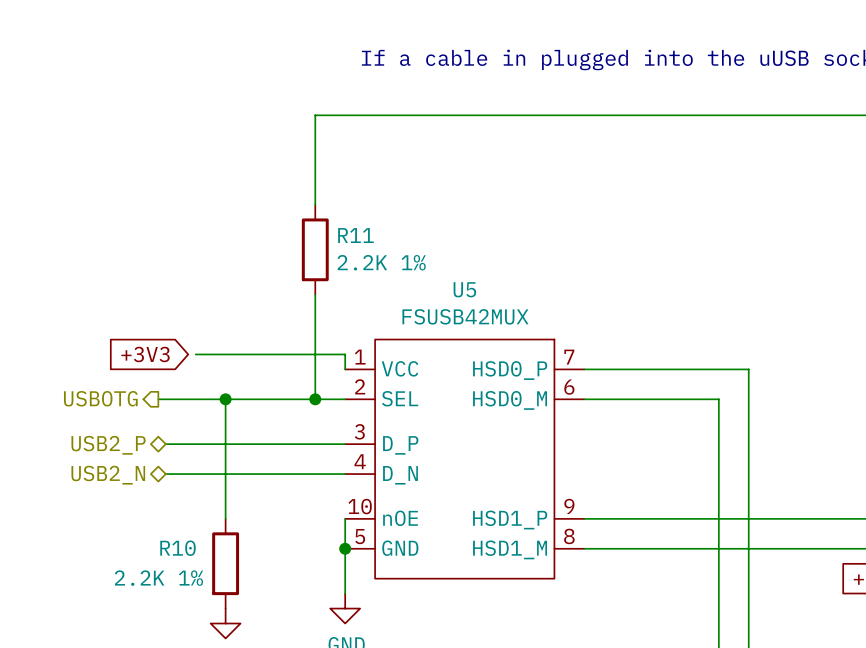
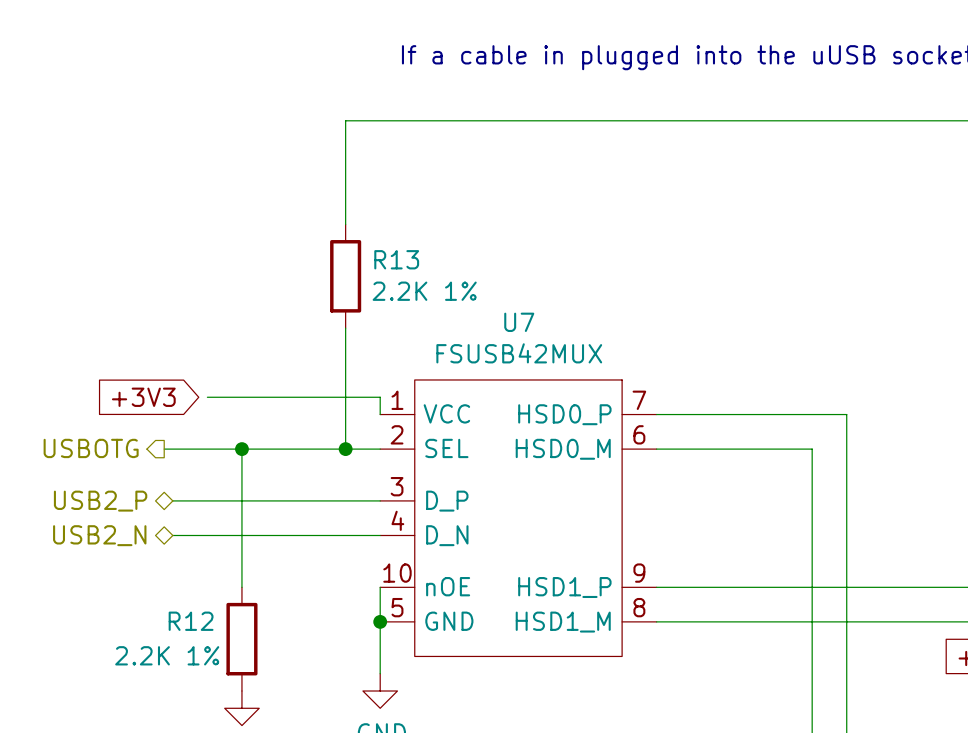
R11 name: R11 (355, 235) -> R13 (396, 259)
U5 name: U5 (464, 289) -> U7 (519, 322)
R10 name: R10 (177, 548) -> R12 (191, 621)

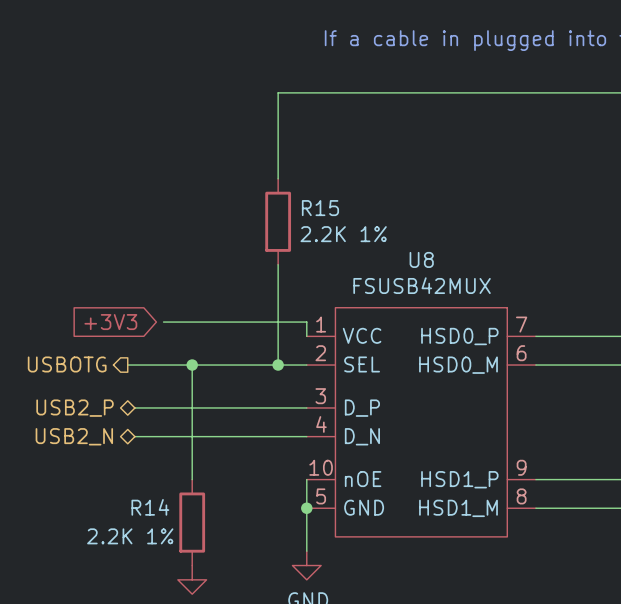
R13 name: R13 (396, 259) -> R15 (320, 208)
U7 name: U7 (519, 322) -> U8 (421, 259)
R12 name: R12 (191, 621) -> R14 (150, 507)

